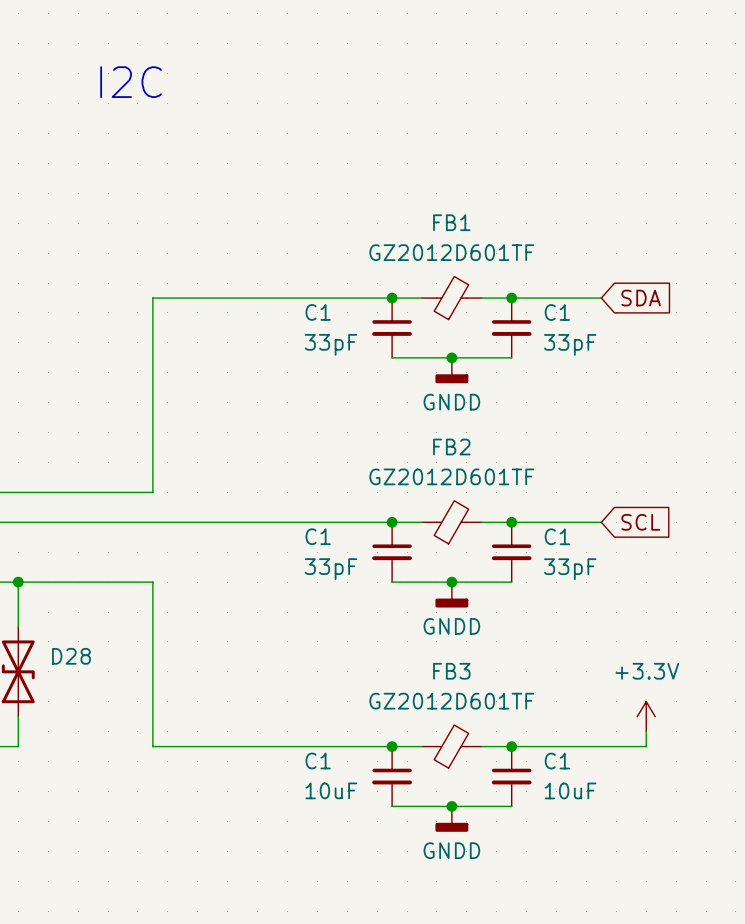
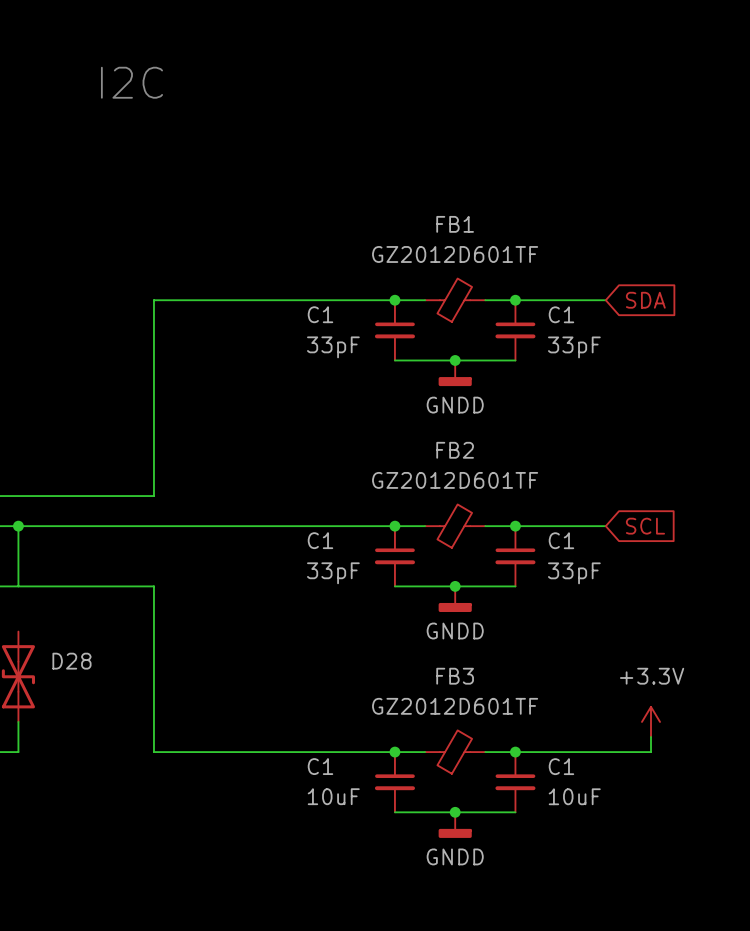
wire: (18, 582) (18, 626) -> (18, 586) (18, 526)
junction position: (18, 582) -> (18, 526)

